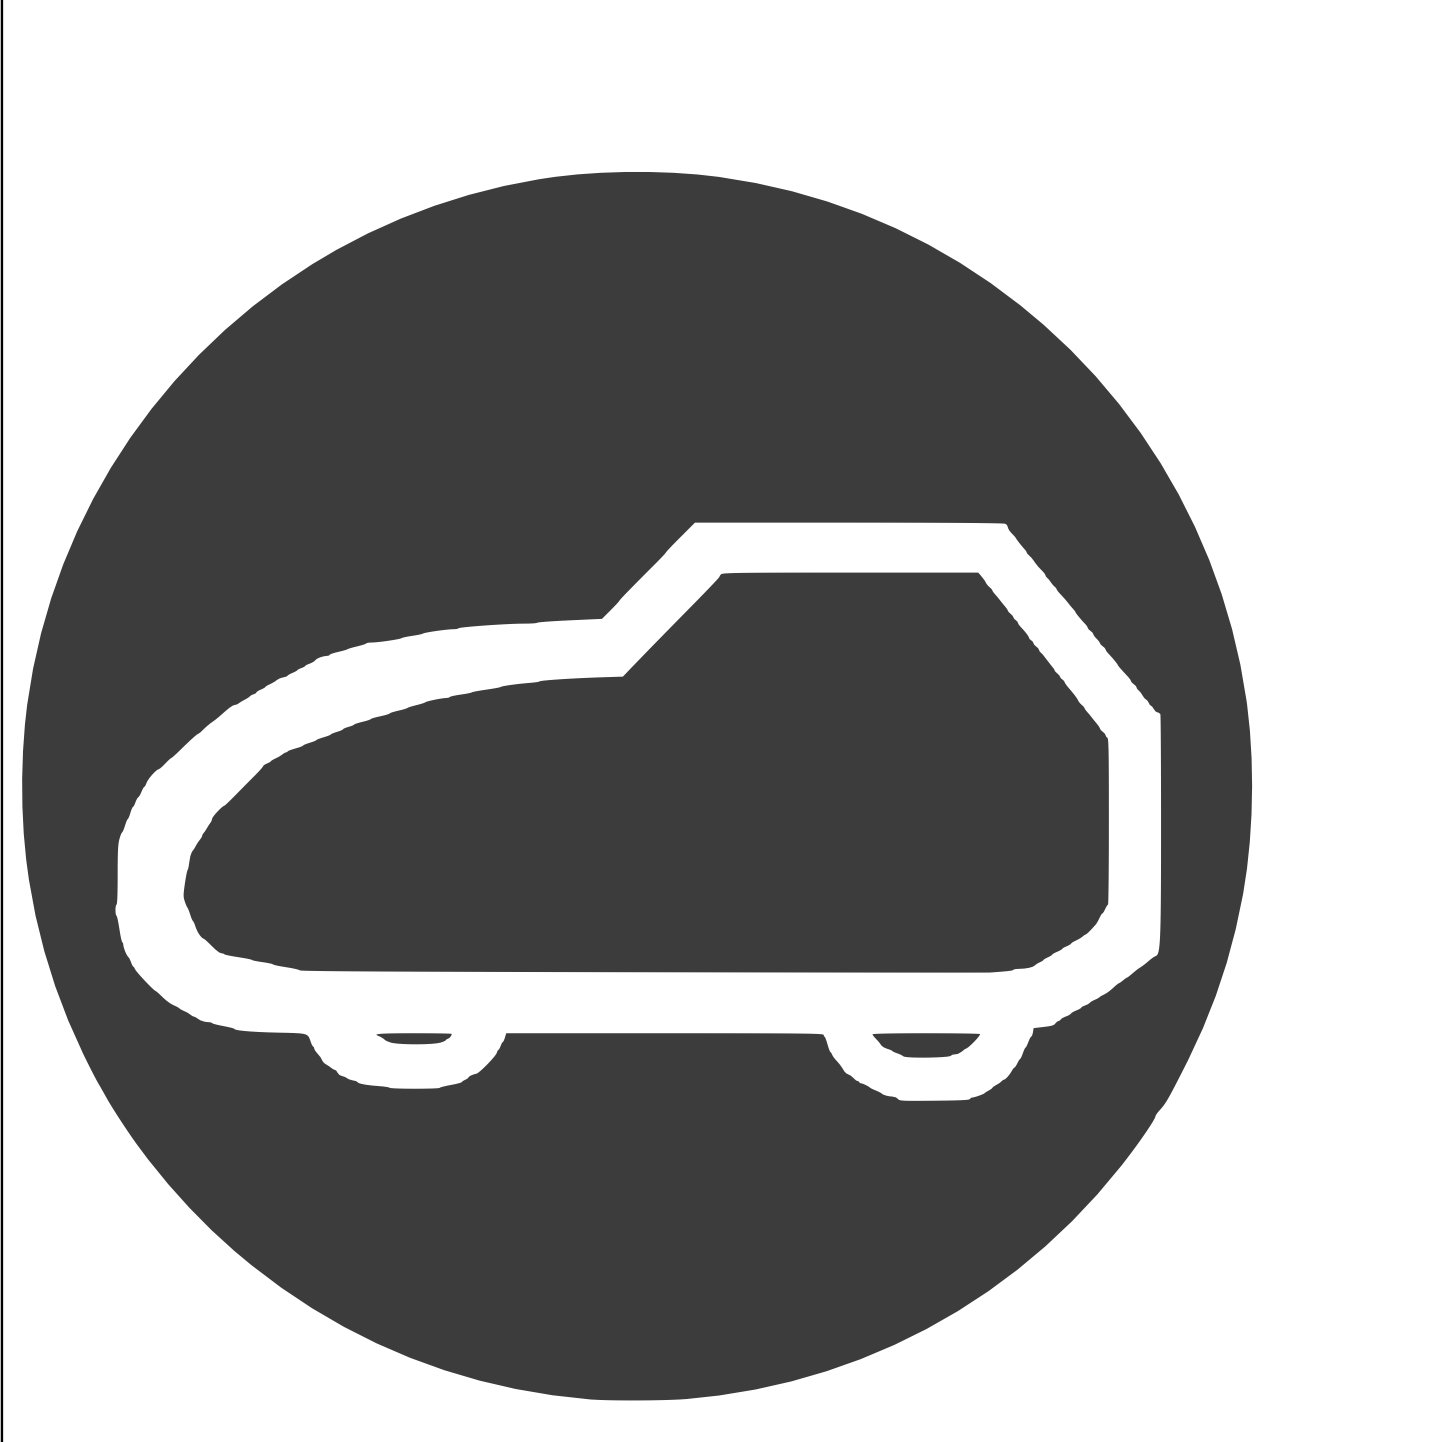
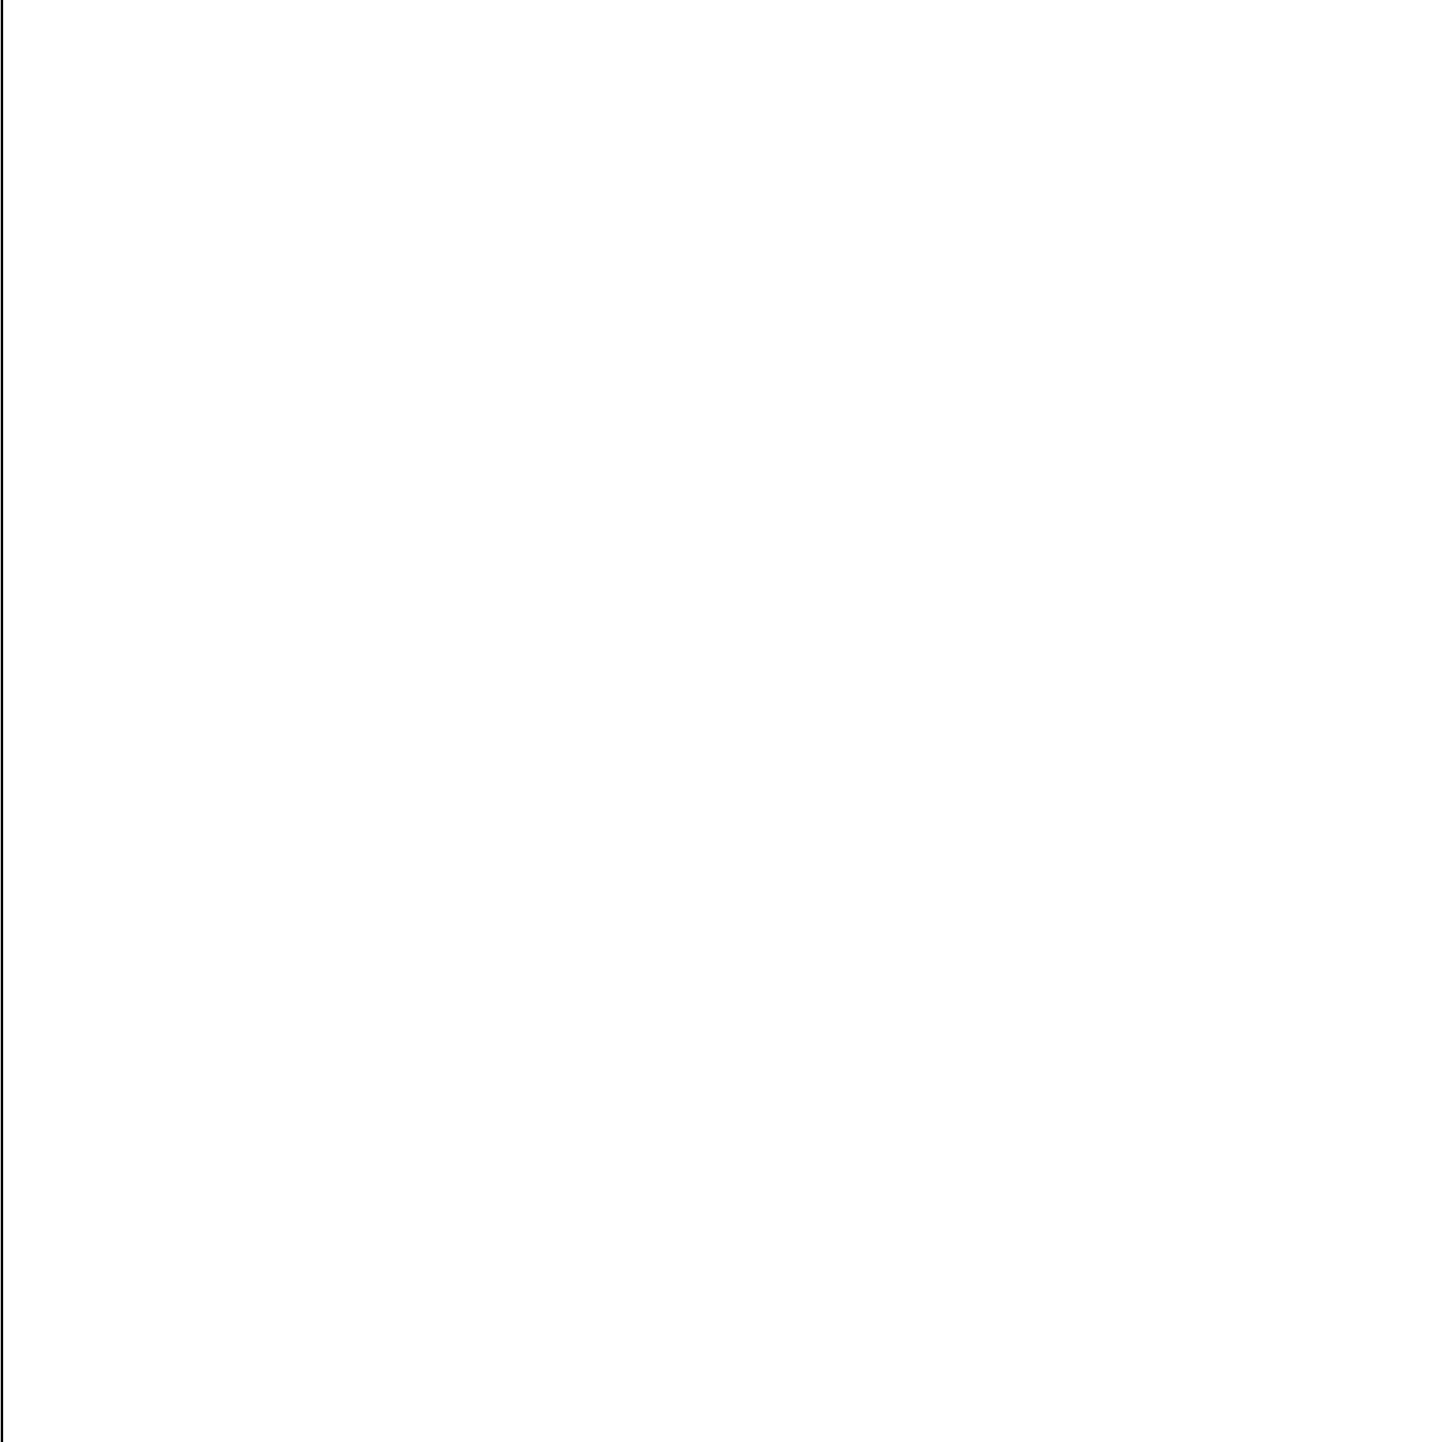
drawing: [22, 171, 1253, 1401] -> none

